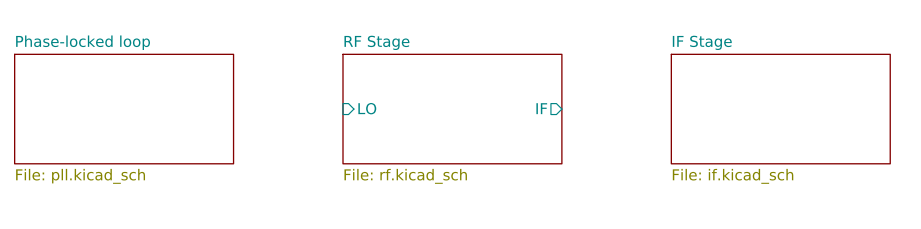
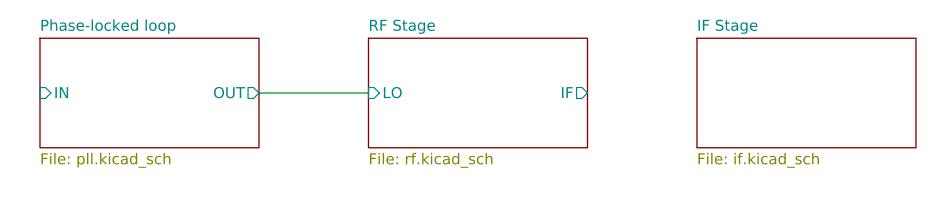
sheet pin: none -> IN (61, 92)
sheet pin: none -> OUT (229, 92)
wire: none -> (258, 93) (368, 93)

